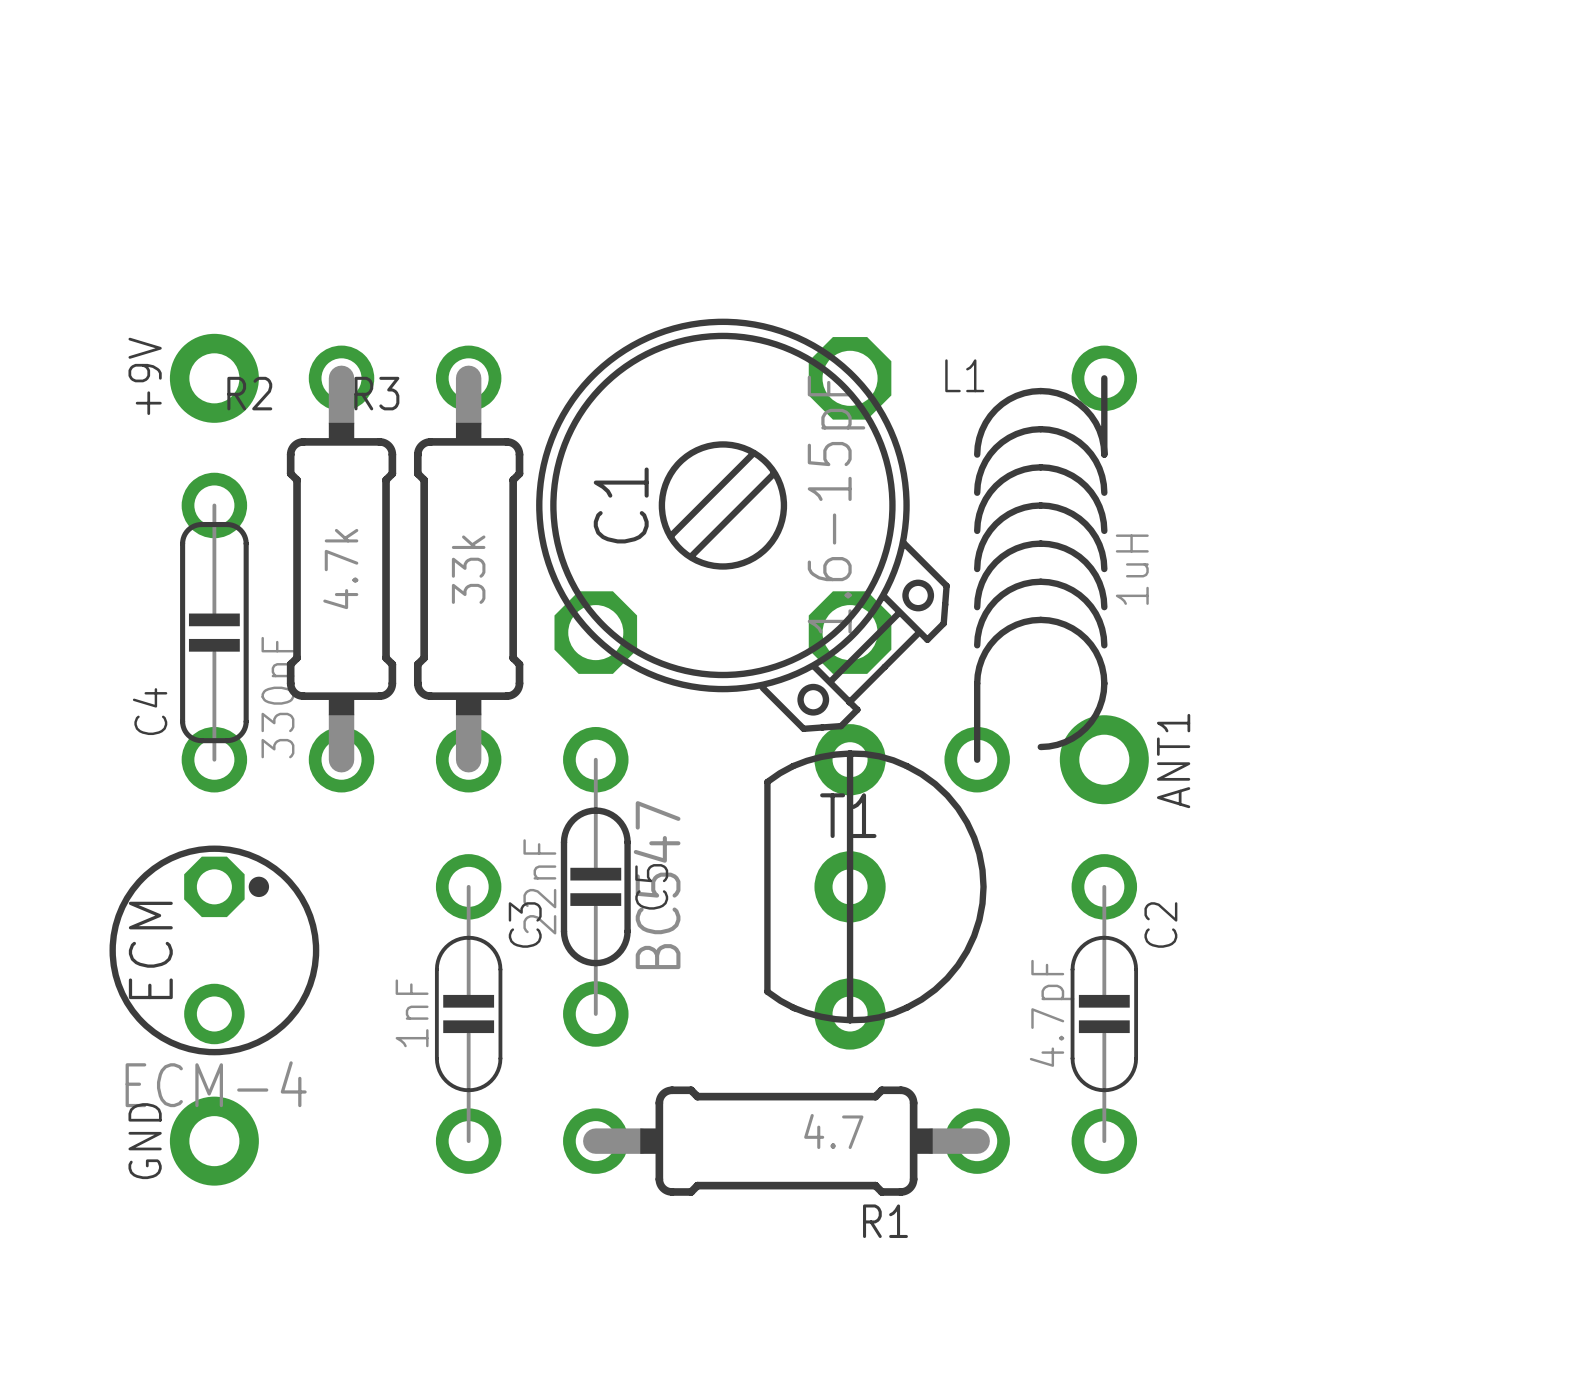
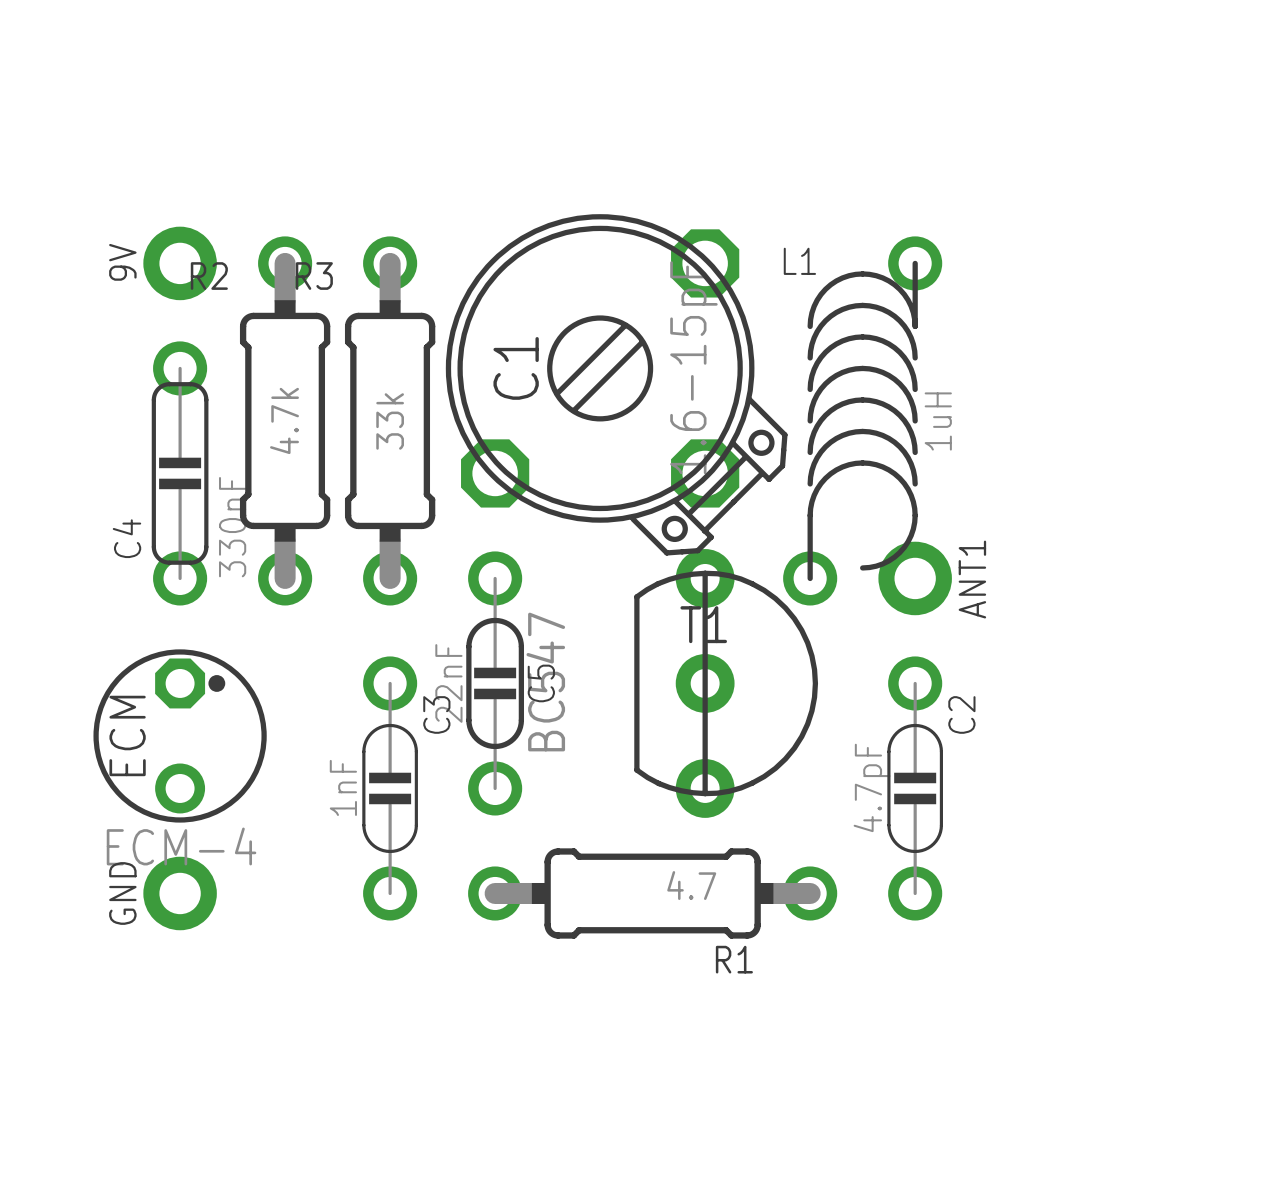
+9V name: +9V (145, 376) -> 9V (122, 262)

